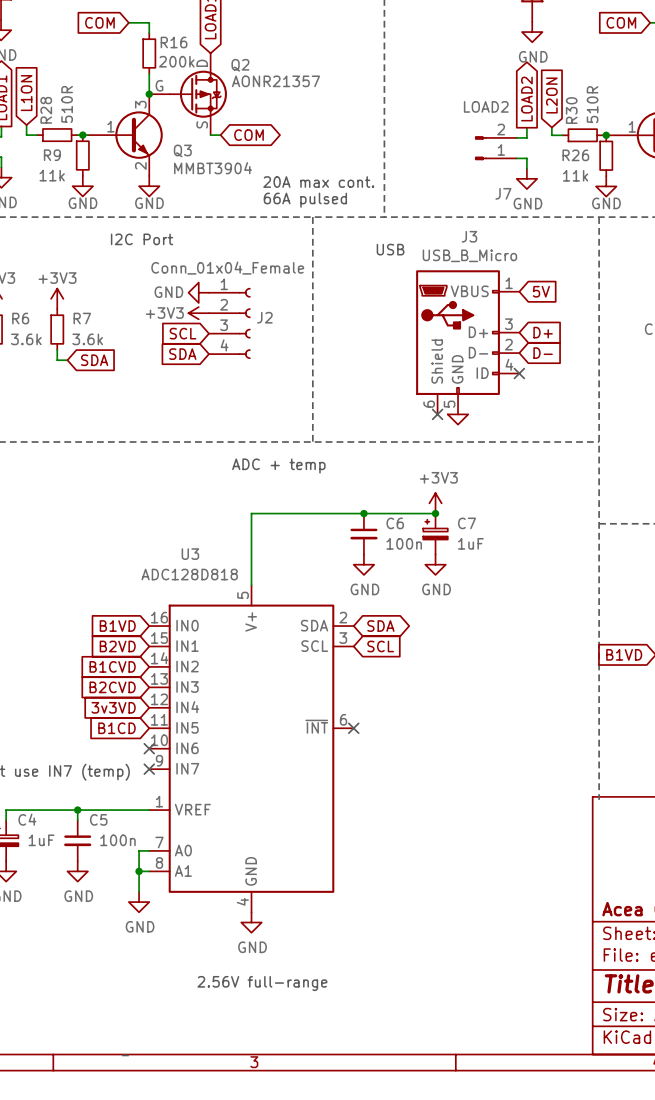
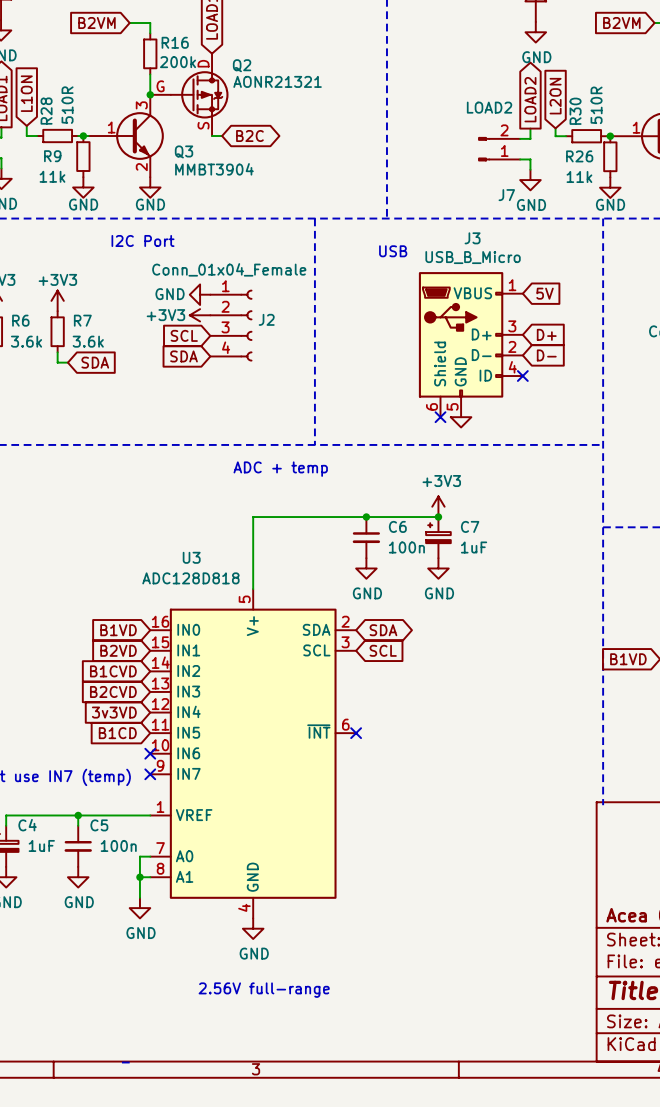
global label: COM (99, 22) -> B2VM (96, 23)
global label: COM (621, 22) -> B2VM (621, 23)
Q2 value: AONR21357 (275, 81) -> AONR21321 (277, 81)
global label: COM (249, 135) -> B2C (249, 136)
text: 20A max cont. (318, 182) -> none
text: 66A pulsed (305, 200) -> none

